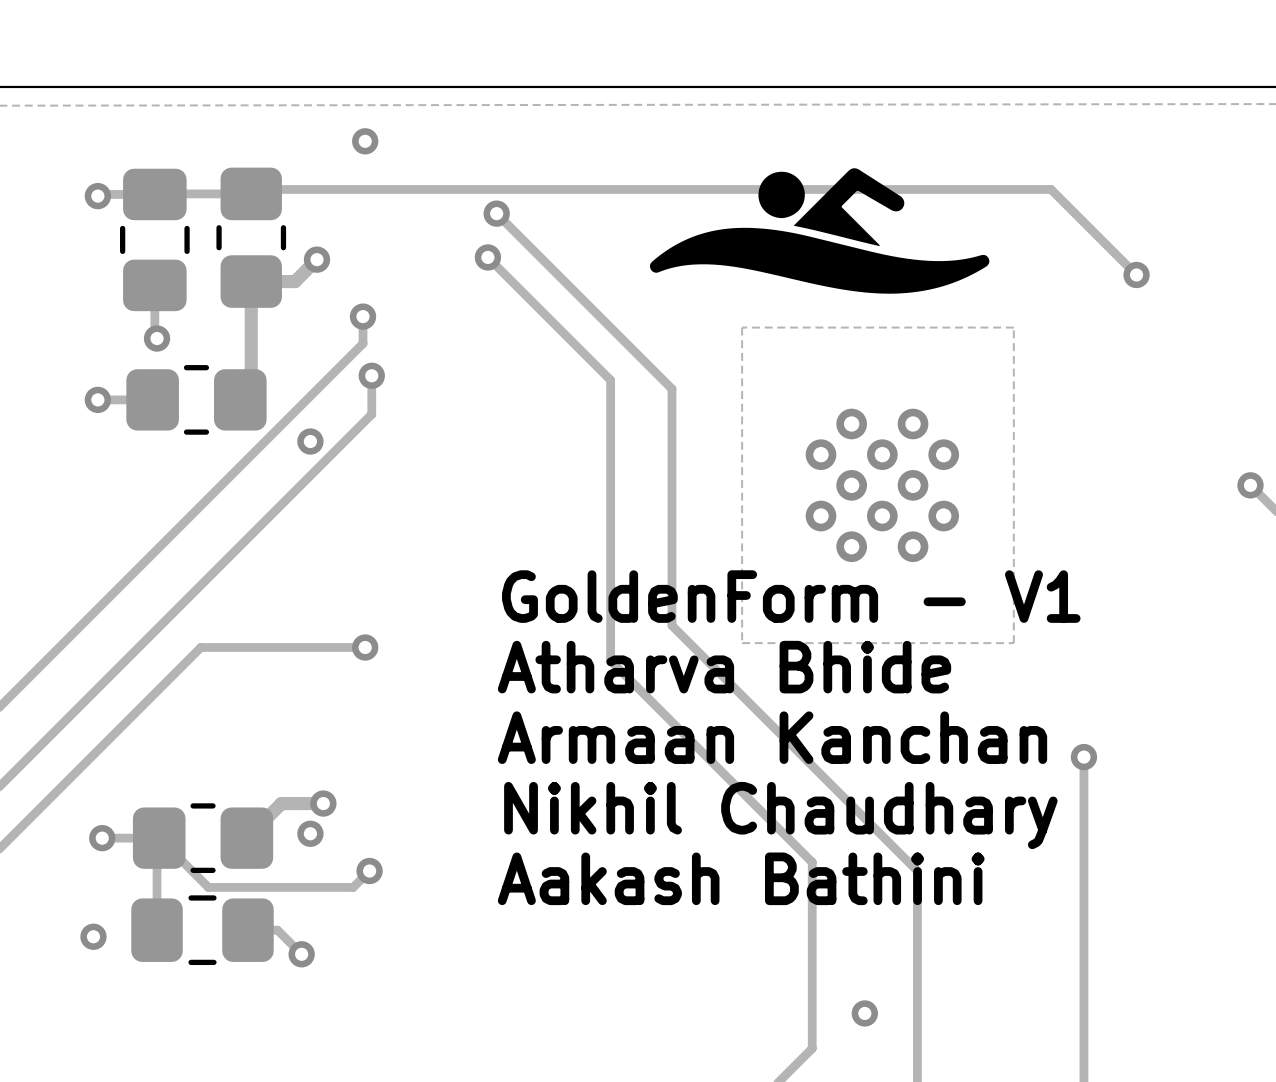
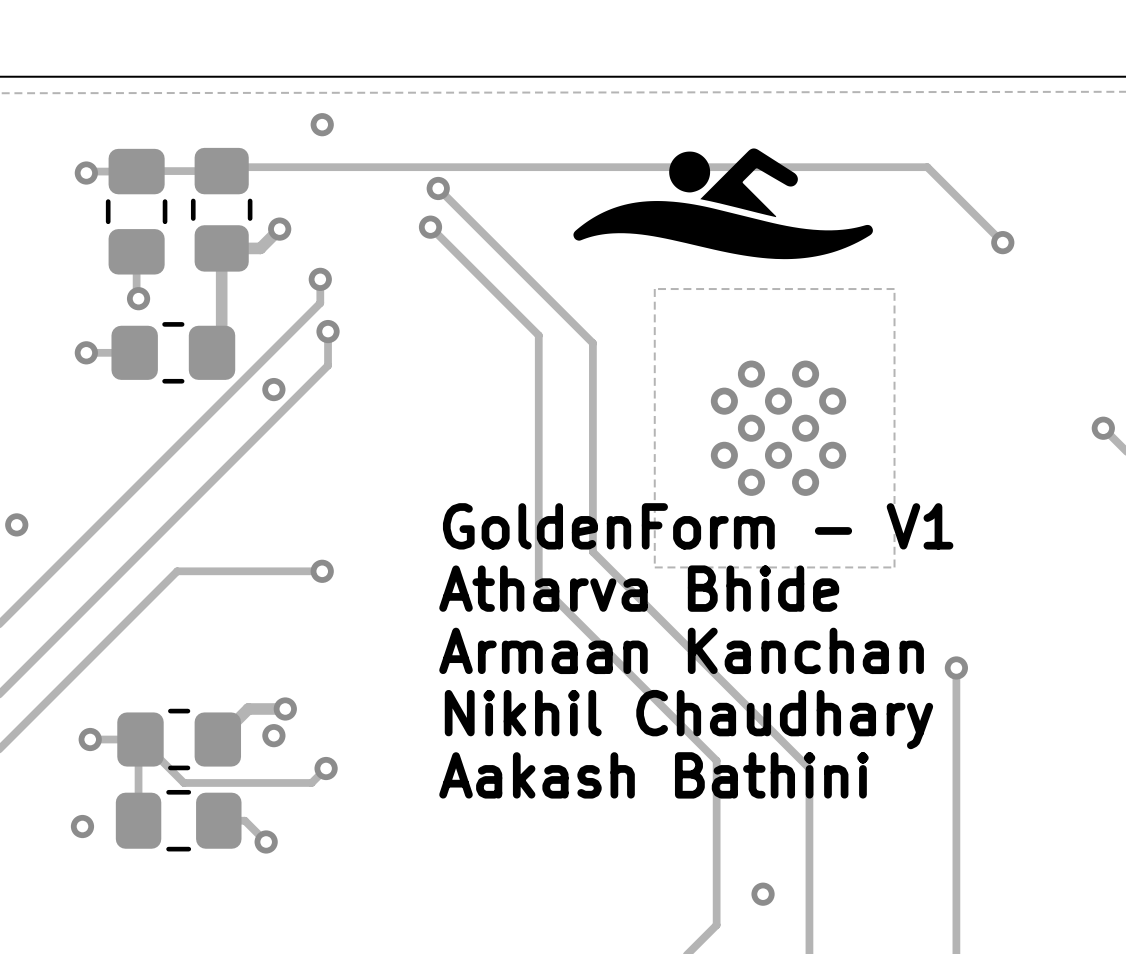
via: none -> (16, 524)

